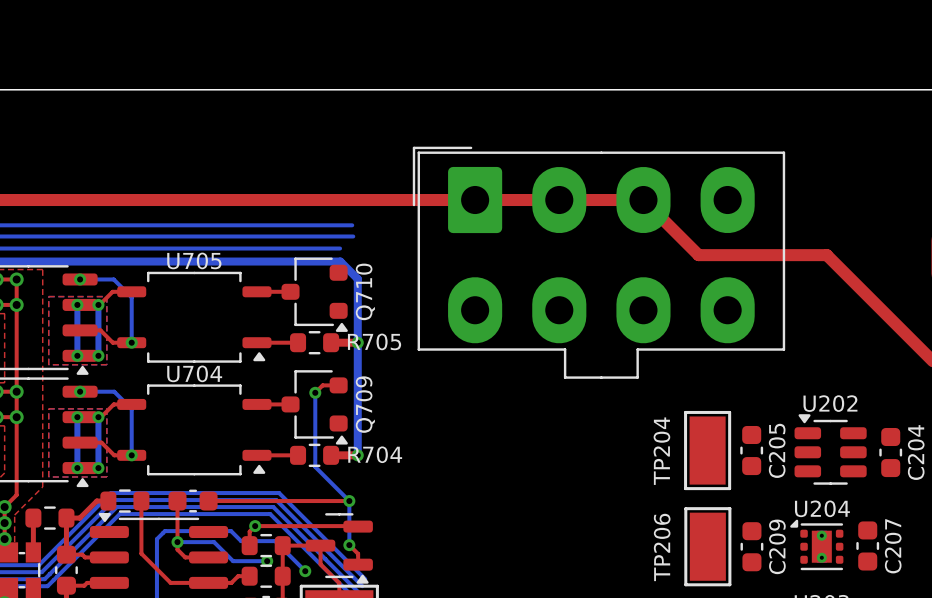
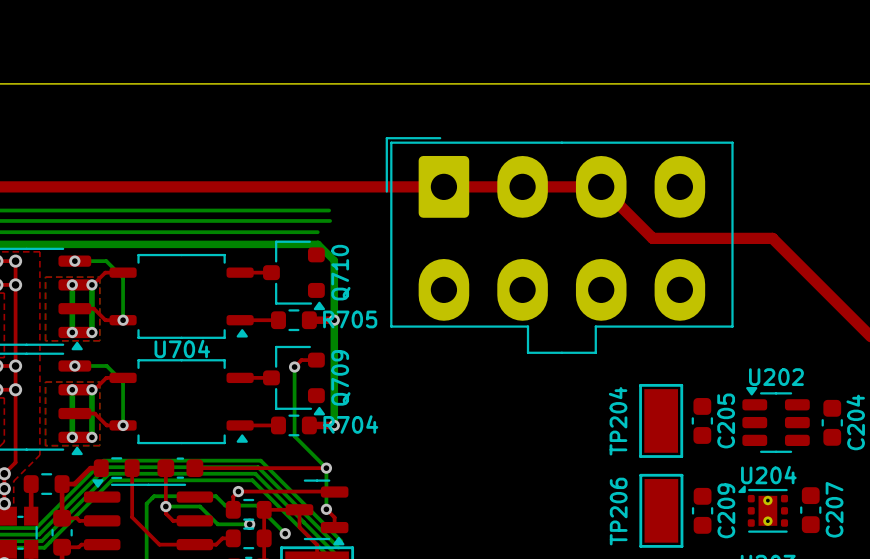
U705 name: U705 (194, 260) -> none

